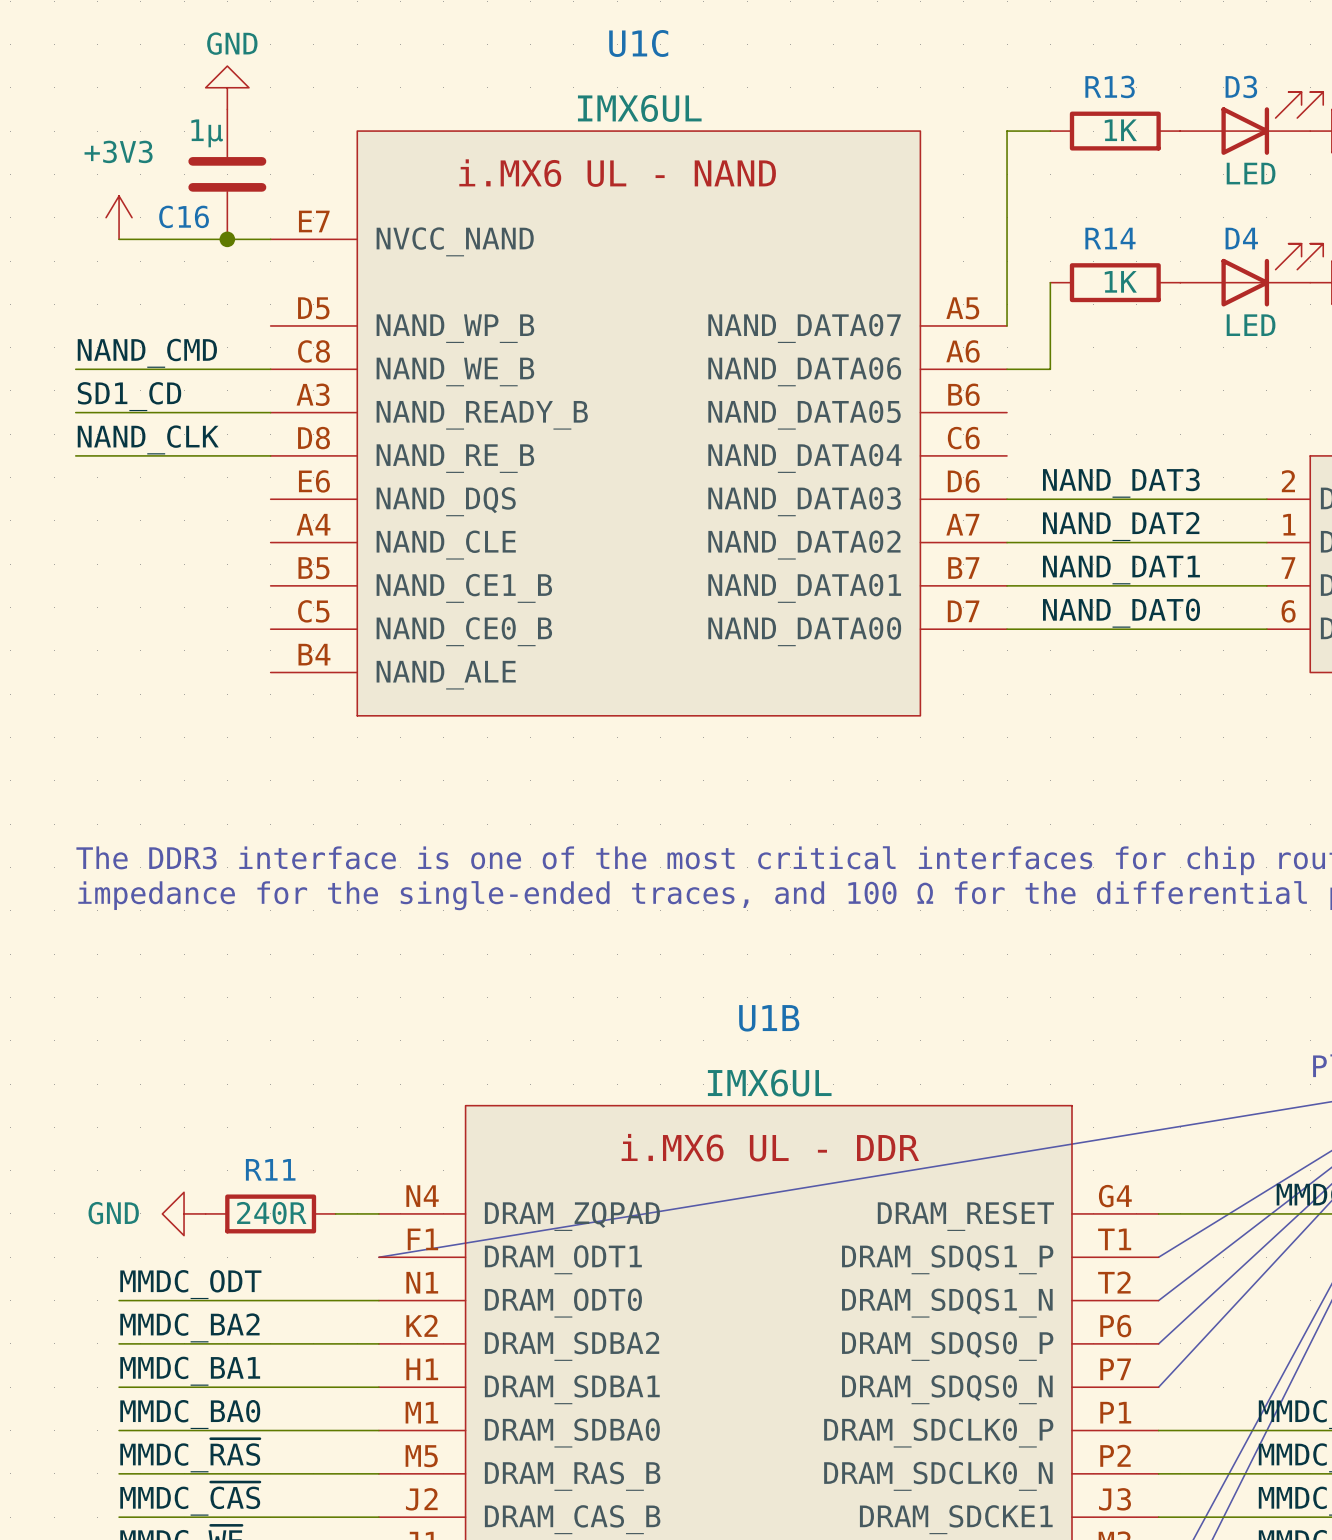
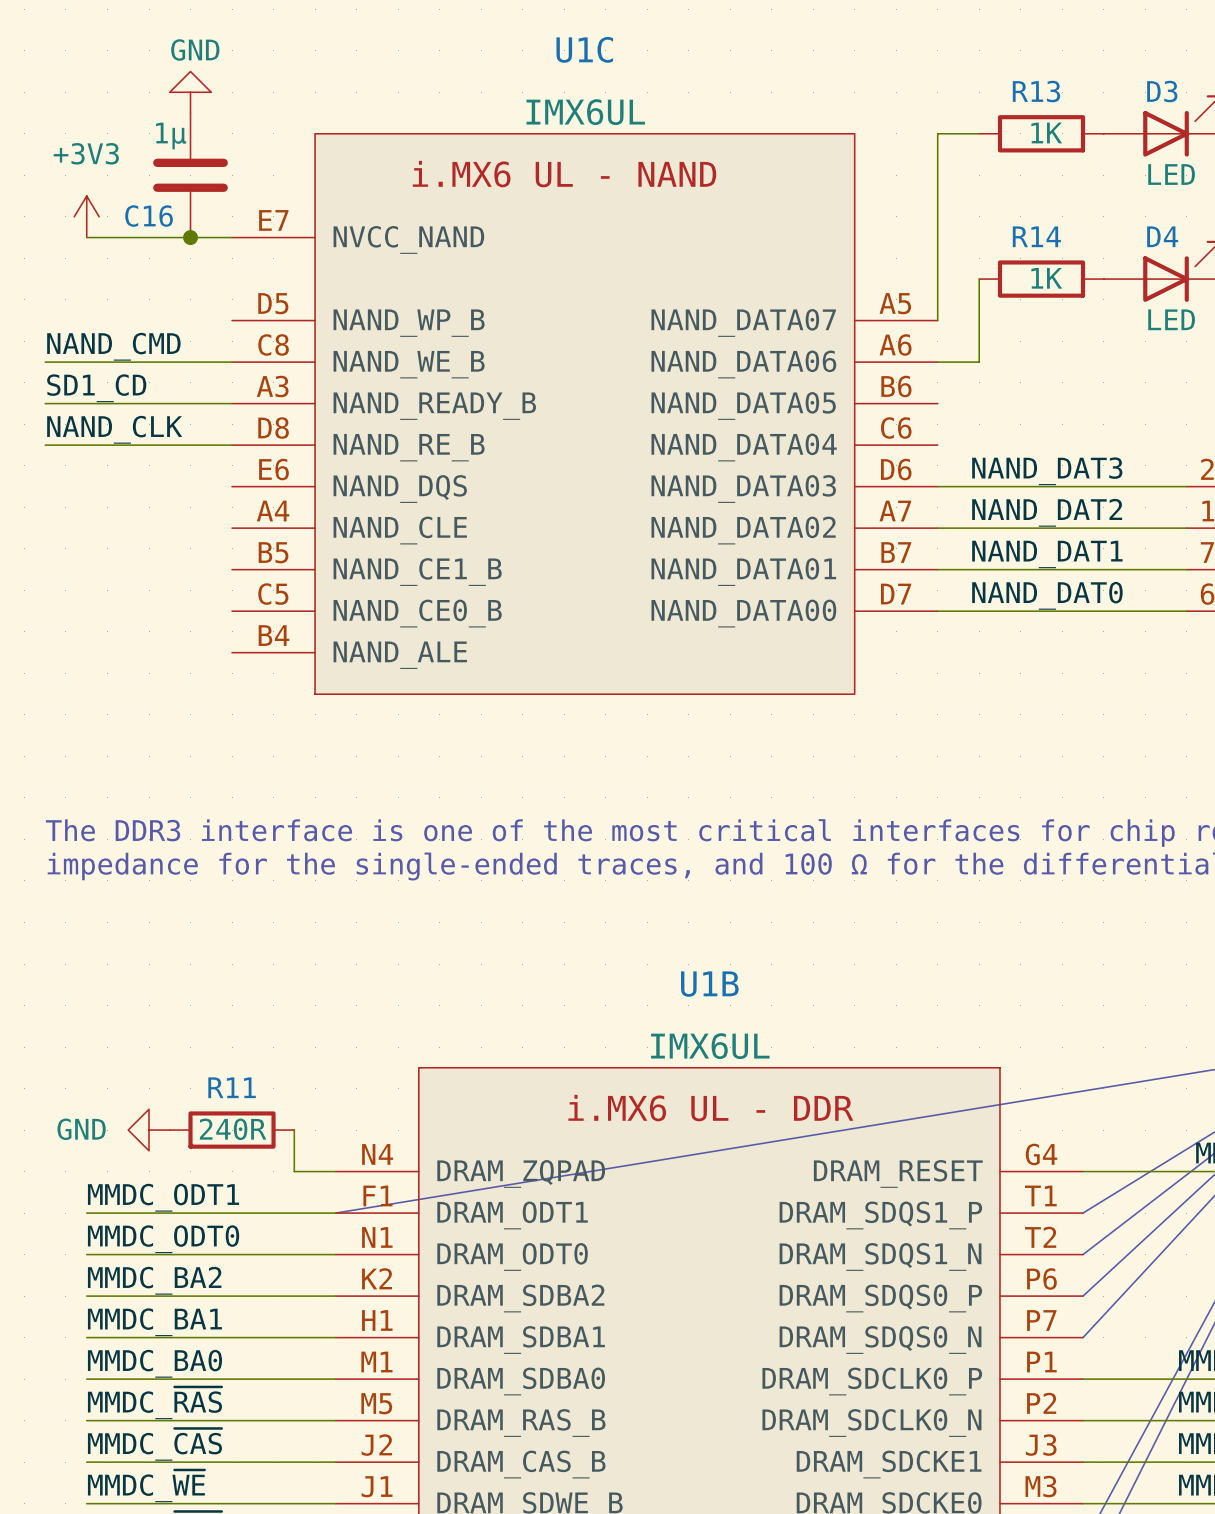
wire: none -> (294, 1130) (294, 1171)
power symbol position: GND (184, 1213) -> GND (149, 1130)
R11 position: (270, 1213) -> (232, 1130)
label: none -> MMDC_ODT1 (163, 1197)
wire: none -> (86, 1213) (335, 1213)
label: MMDC_ODT (190, 1284) -> MMDC_ODT0 (163, 1239)

